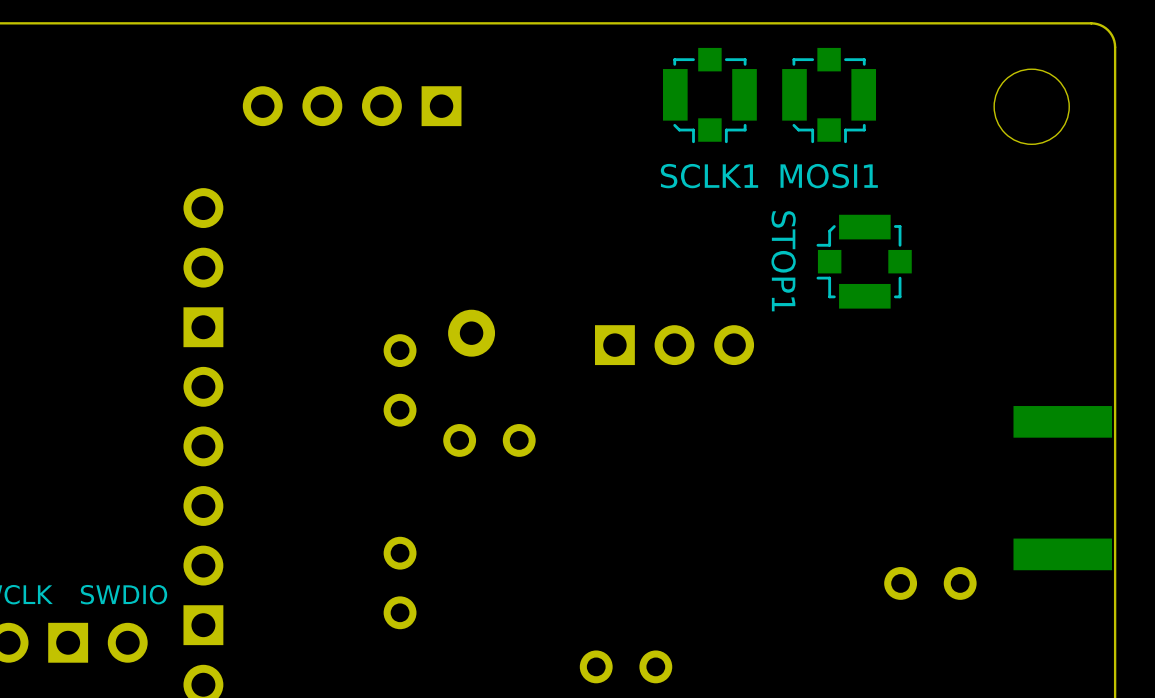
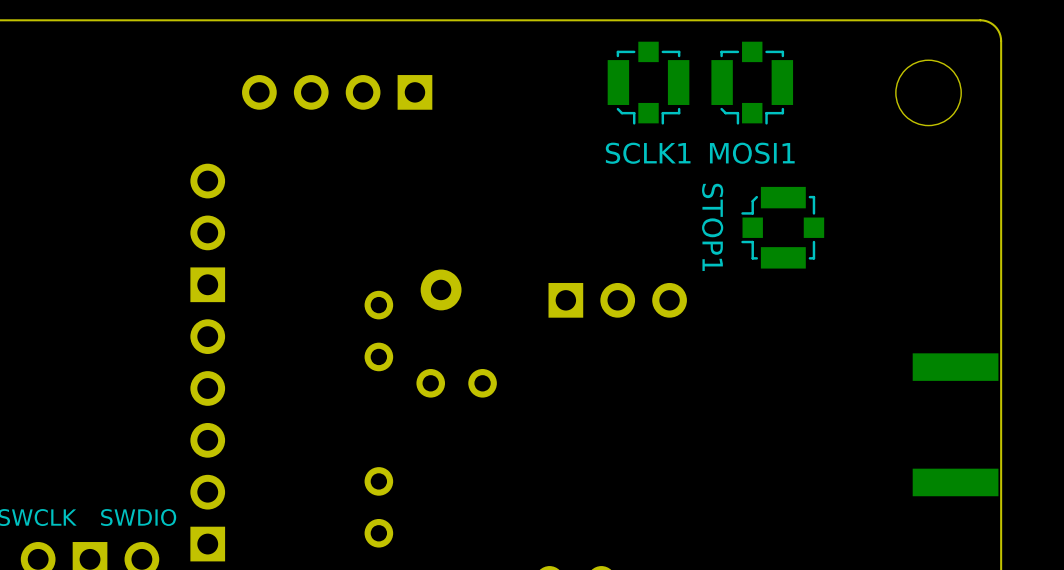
part: (930, 583) -> none

